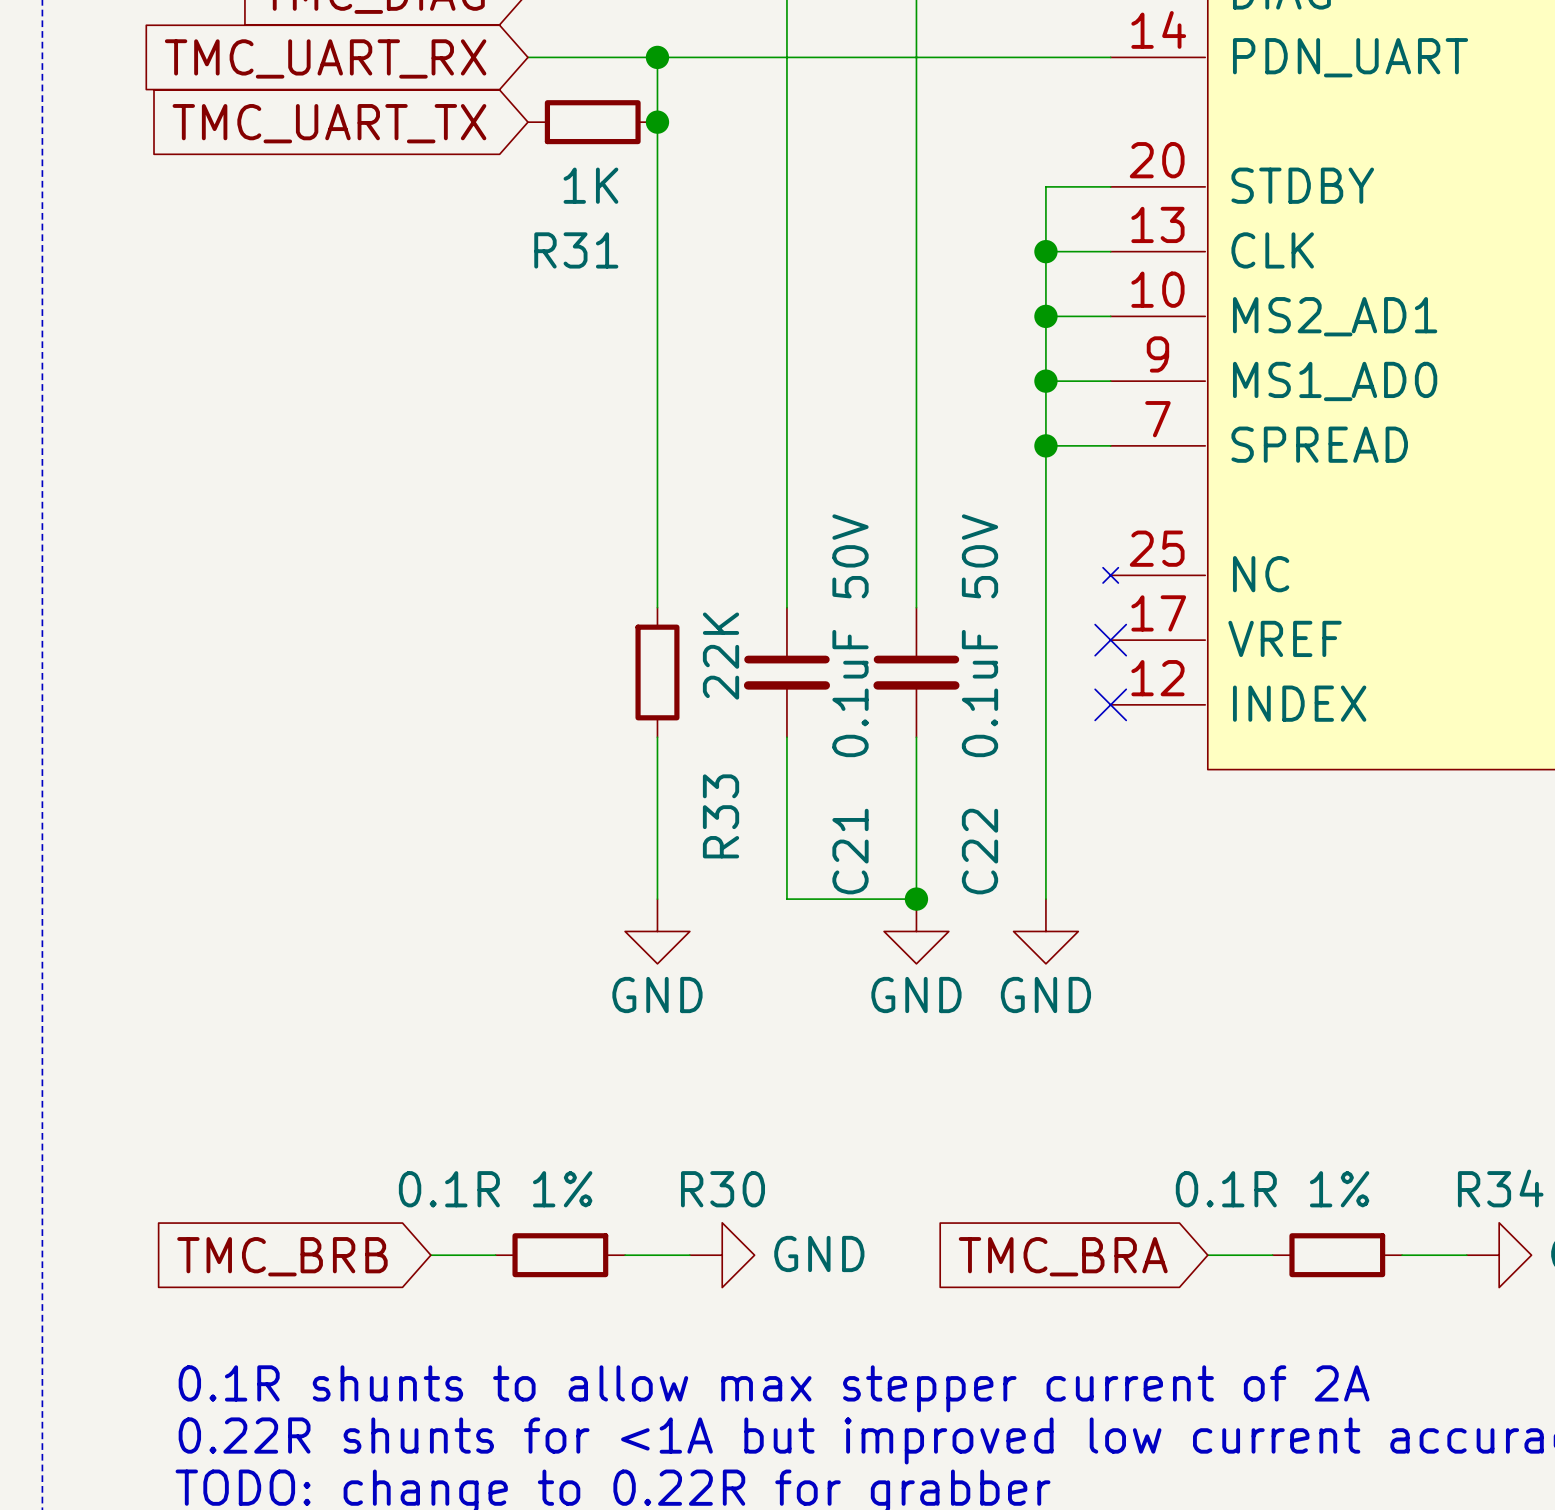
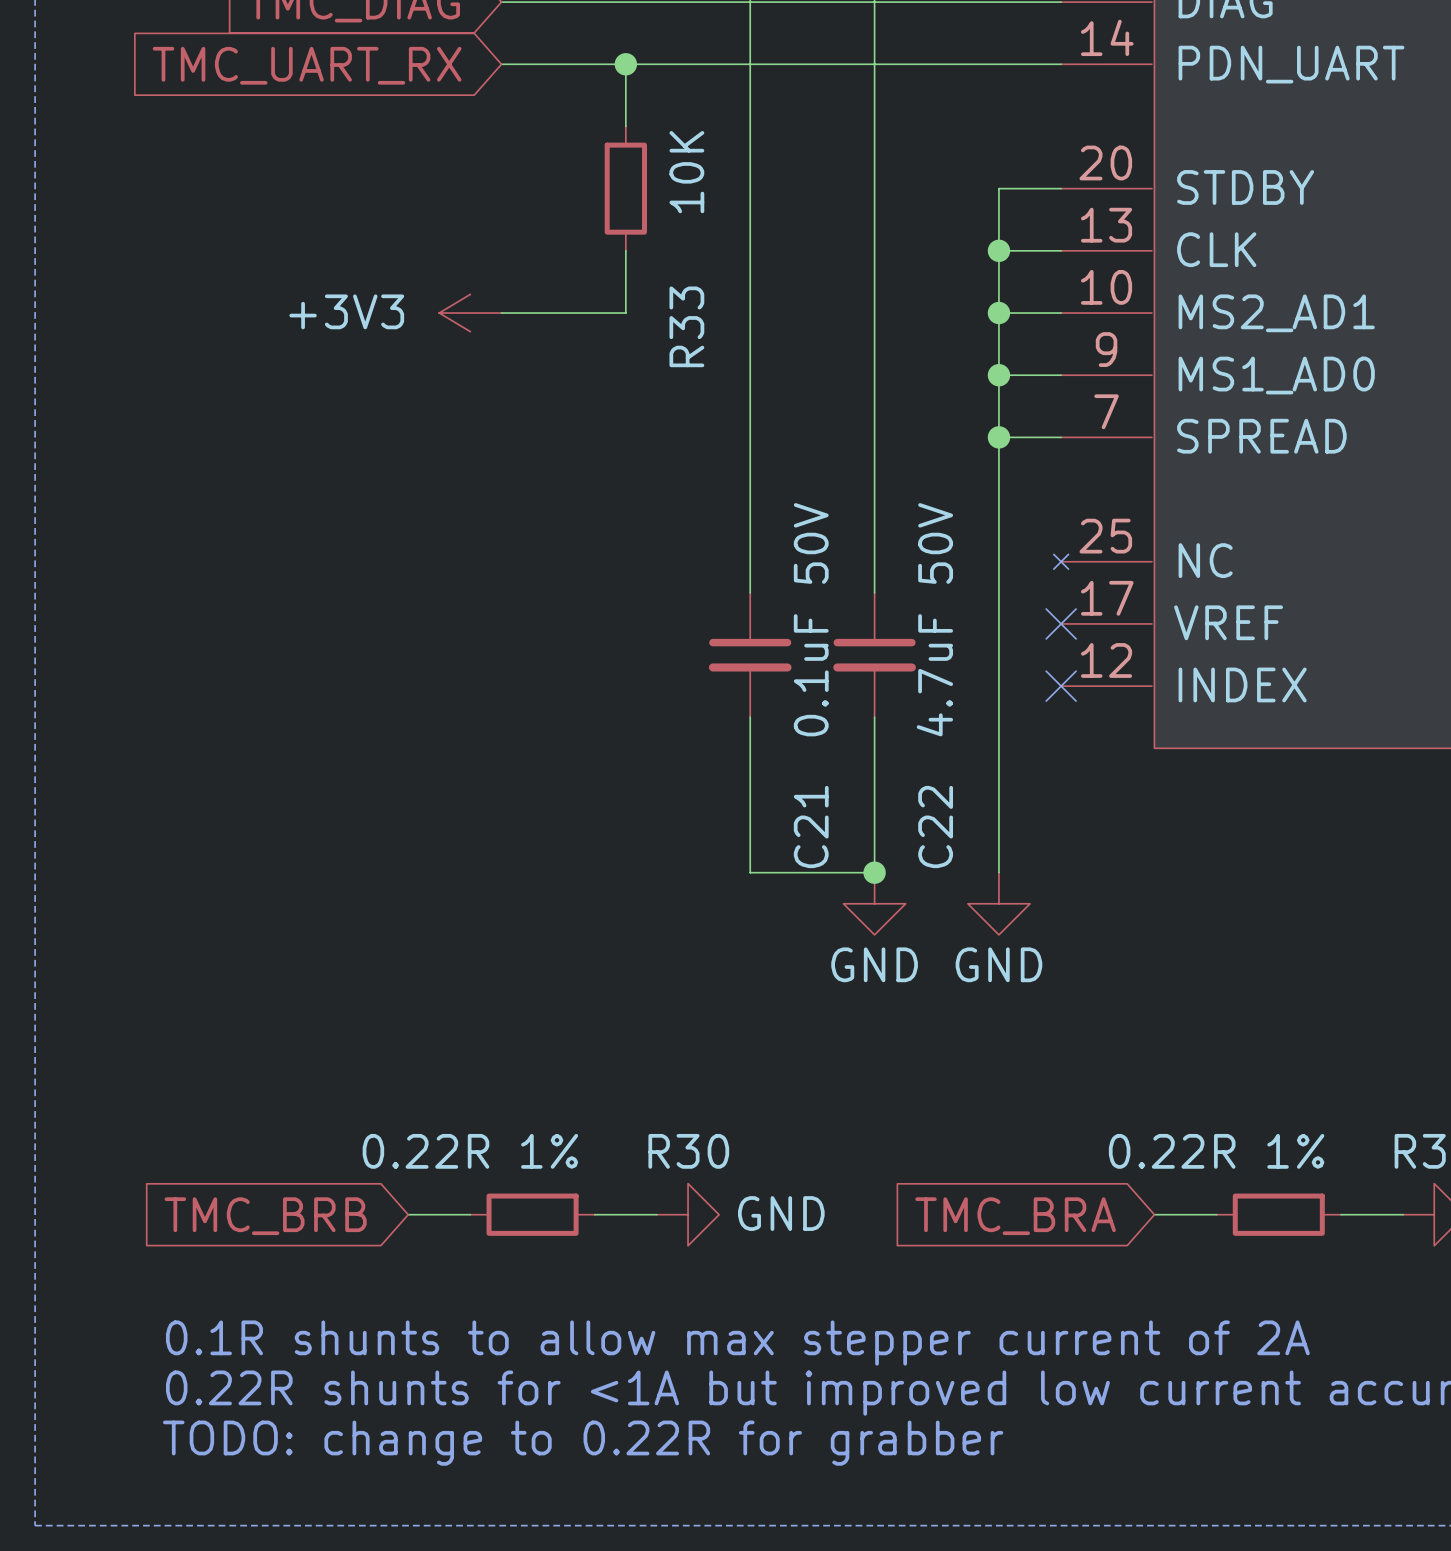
R31: 1K (592, 122) -> none
wire: (657, 122) (657, 251) -> none
junction: (657, 122) -> none
global label: TMC_UART_TX (329, 123) -> none
power symbol: none -> +3V3 (470, 313)
wire: (657, 316) (657, 607) -> (625, 313) (501, 313)
C22 value: 0.1uF 50V (979, 635) -> 4.7uF 50V (934, 619)
R33 value: 22K (721, 656) -> 10K (686, 172)
R33 position: (657, 672) -> (625, 188)
wire: (657, 737) (657, 899) -> none
power symbol: GND (657, 931) -> none
R30 value: 0.1R 1% (495, 1189) -> 0.22R 1% (470, 1151)
R34 value: 0.1R 1% (1272, 1189) -> 0.22R 1% (1216, 1151)

